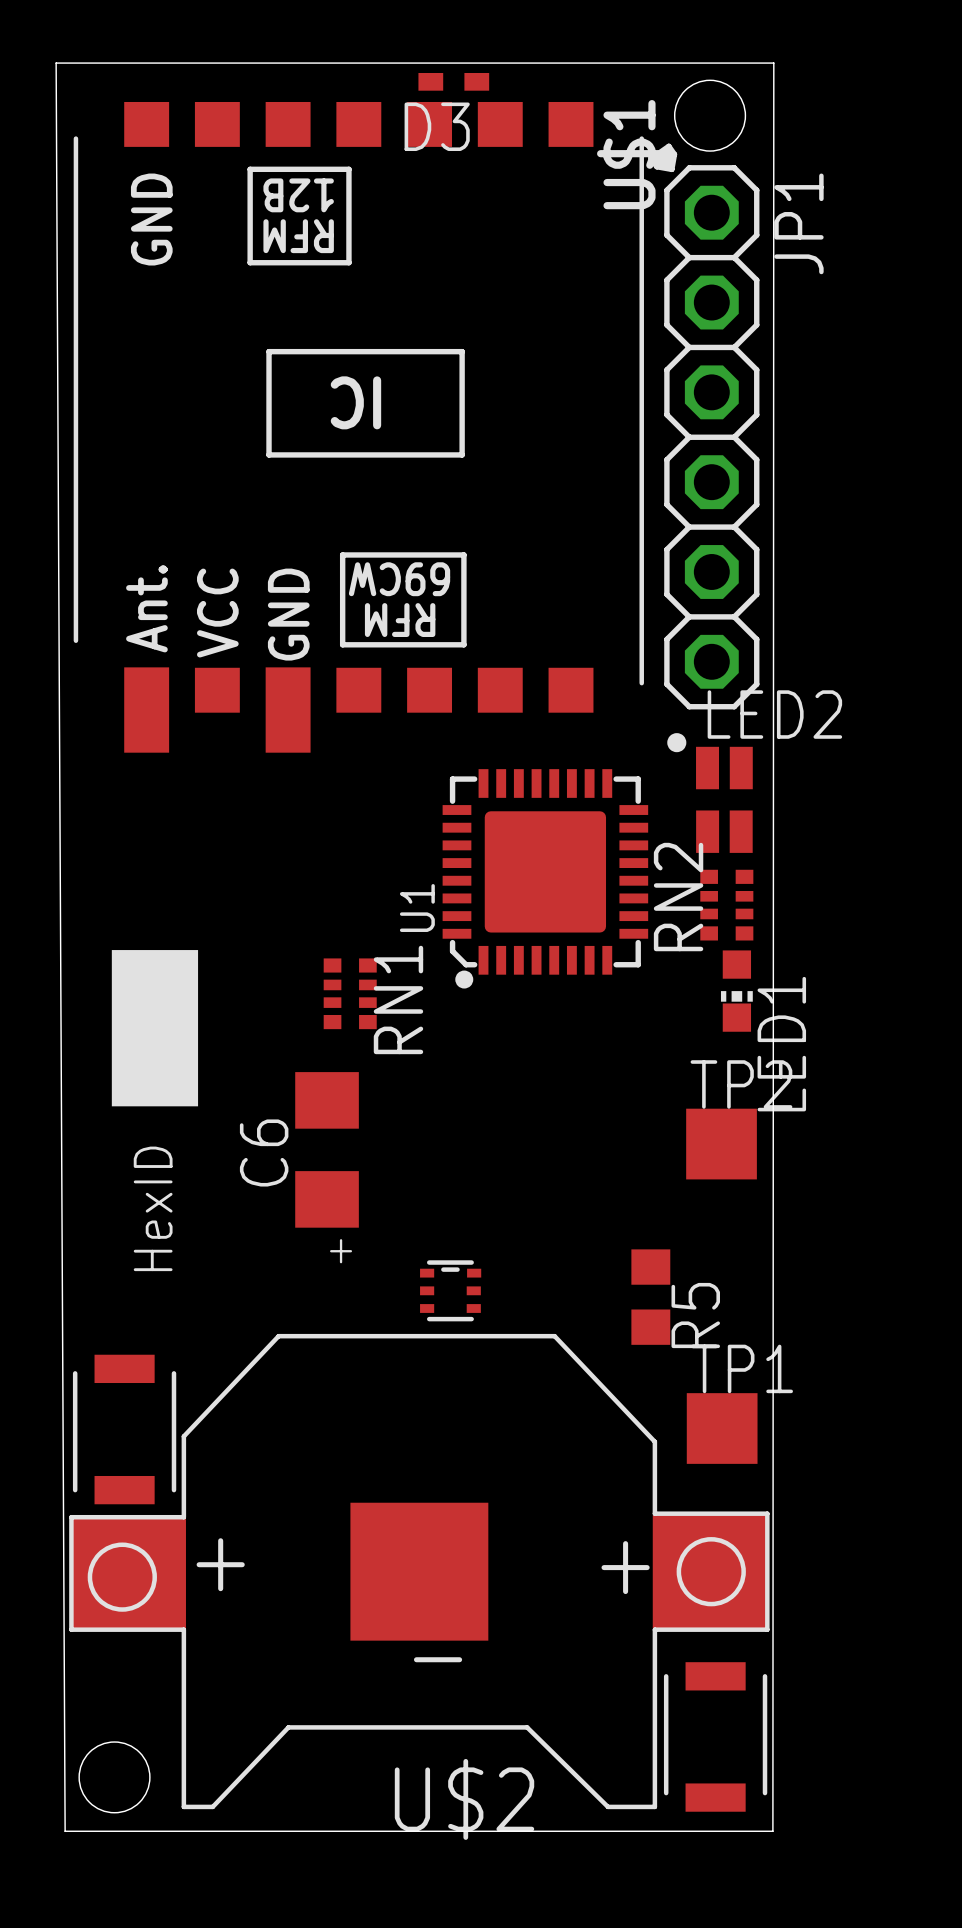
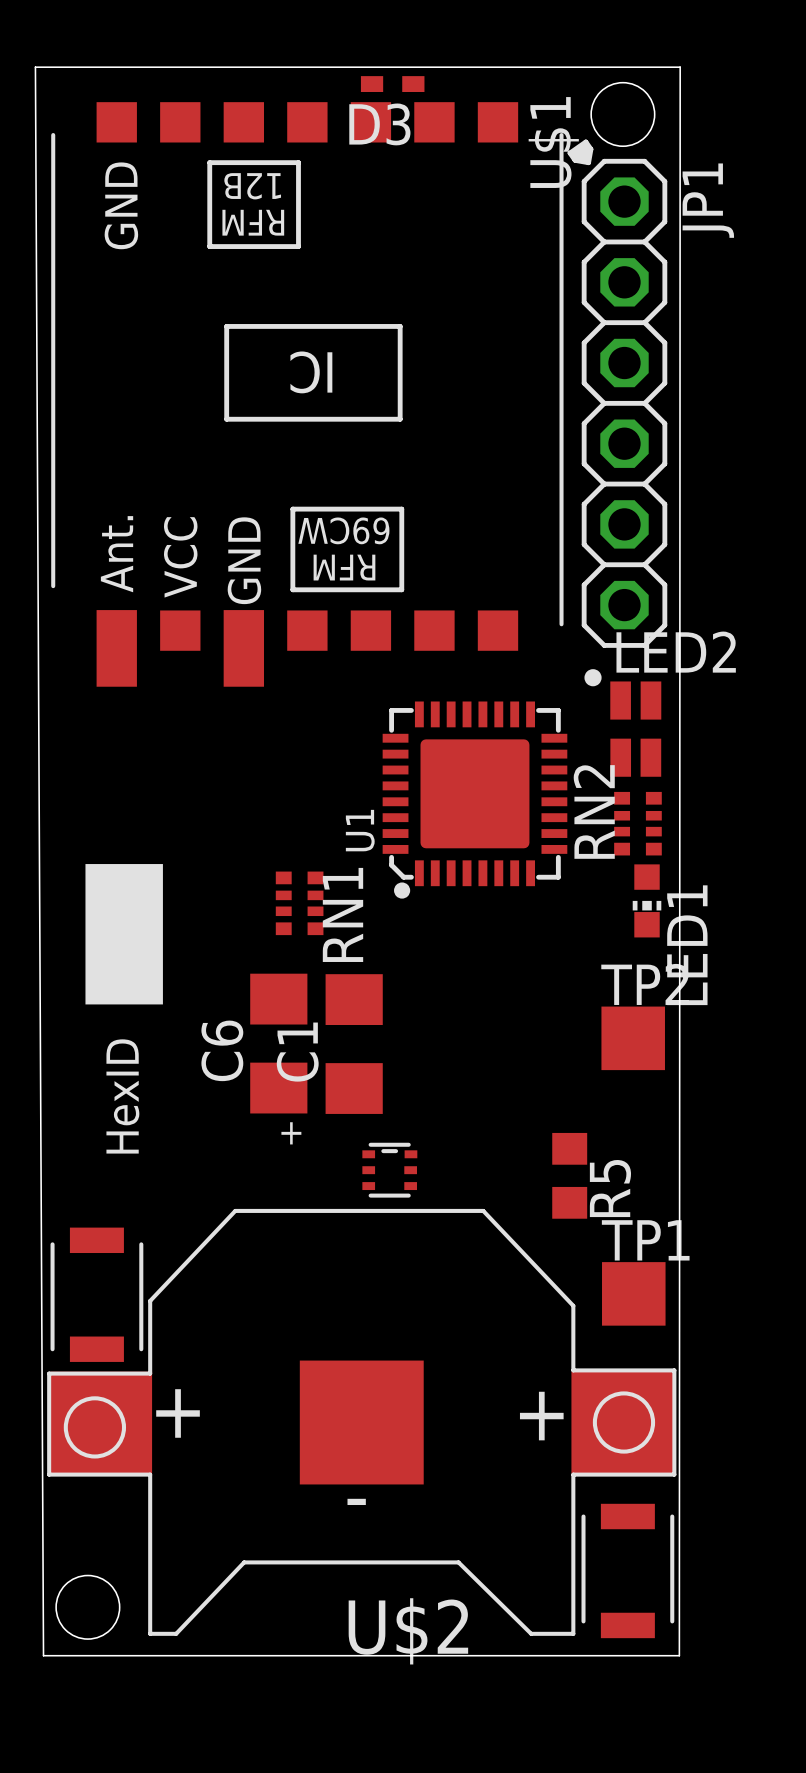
C1: none -> (354, 1044)

